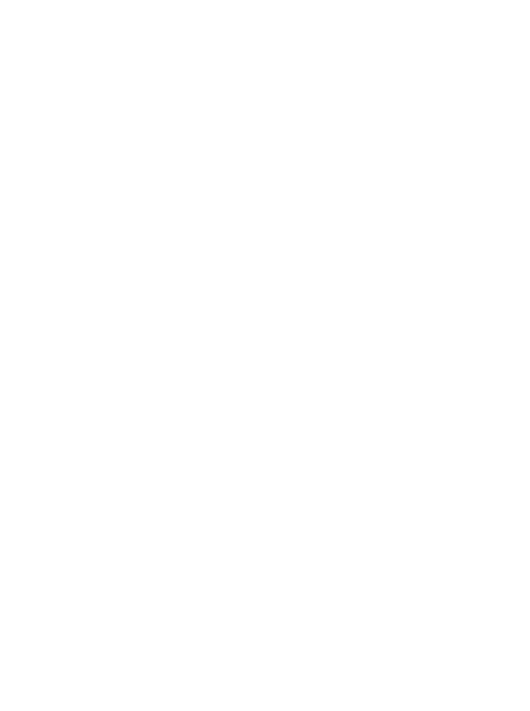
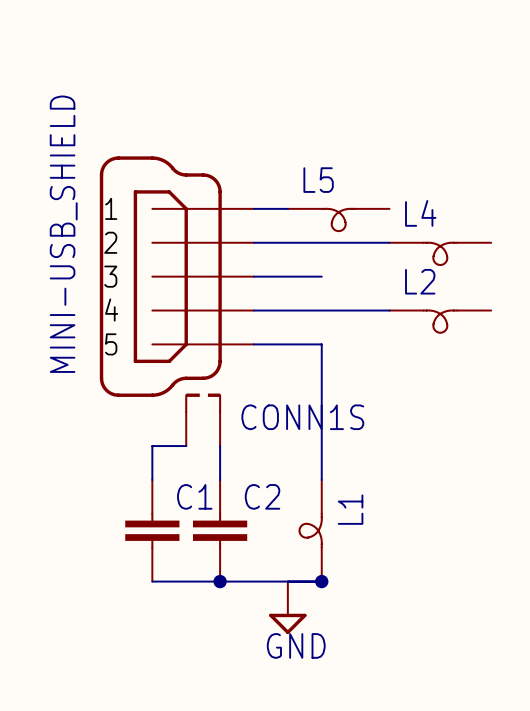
wire: none -> (253, 208) (287, 208)
L5: none -> (338, 219)
wire: none -> (253, 242) (389, 242)
L4: none -> (440, 253)
part: none -> MINI-USB_SHIELD (176, 276)
wire: none -> (253, 276) (321, 276)
wire: none -> (253, 310) (389, 310)
L2: none -> (440, 321)
wire: none -> (253, 344) (321, 344) (321, 479)
CONN1S: none -> (203, 419)
wire: none -> (186, 446) (152, 446) (152, 479)
wire: none -> (220, 446) (220, 479)
C1: none -> (152, 530)
C2: none -> (220, 530)
L1: none -> (310, 530)
wire: none -> (152, 581) (321, 581)
junction: none -> (220, 581)
junction: none -> (321, 581)
power symbol: none -> GND (287, 607)

